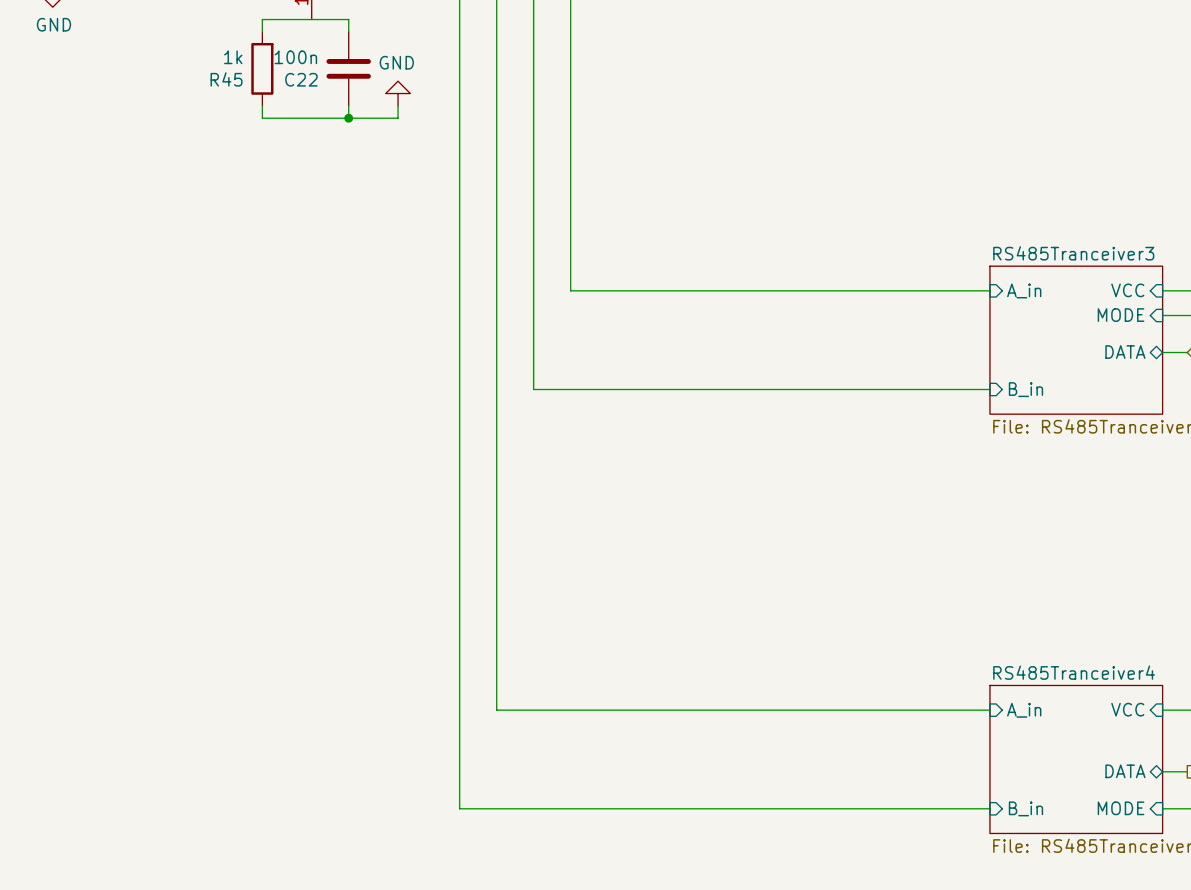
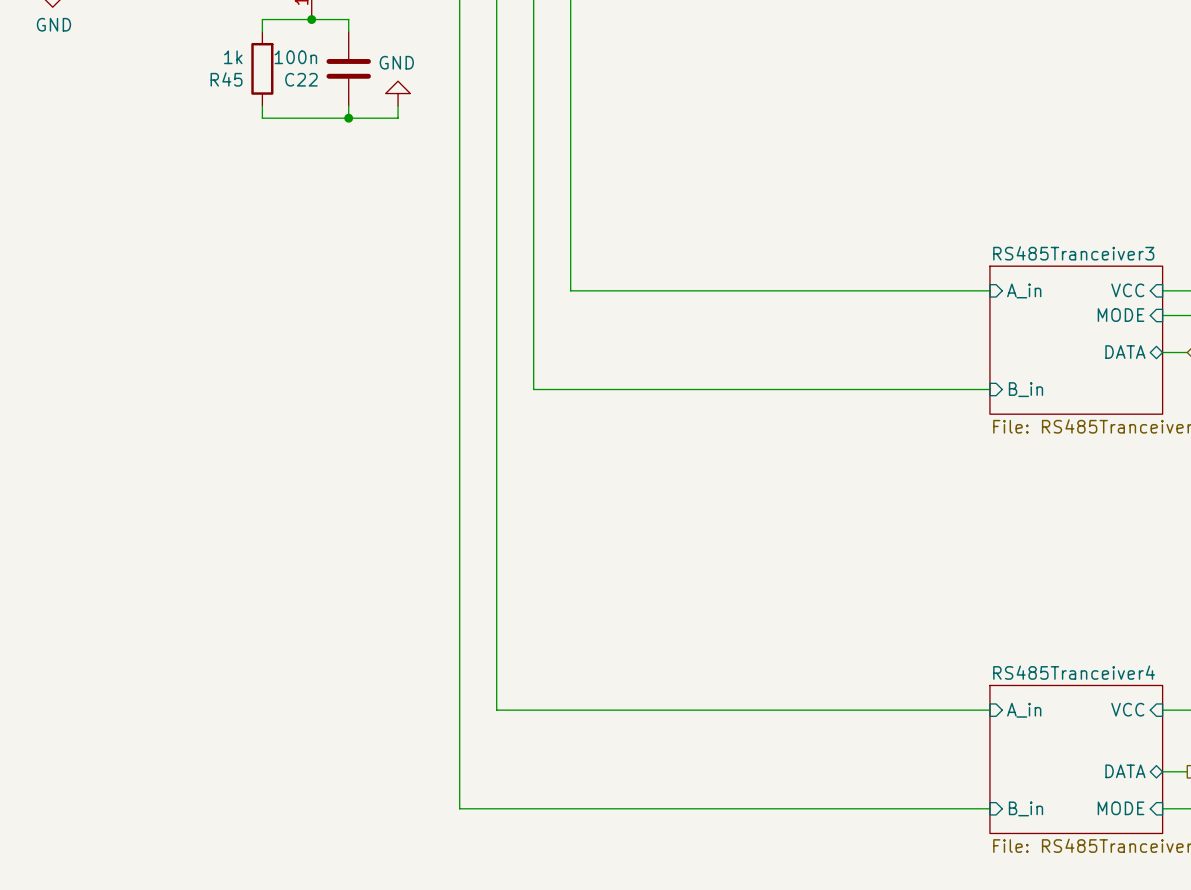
junction: none -> (311, 19)

